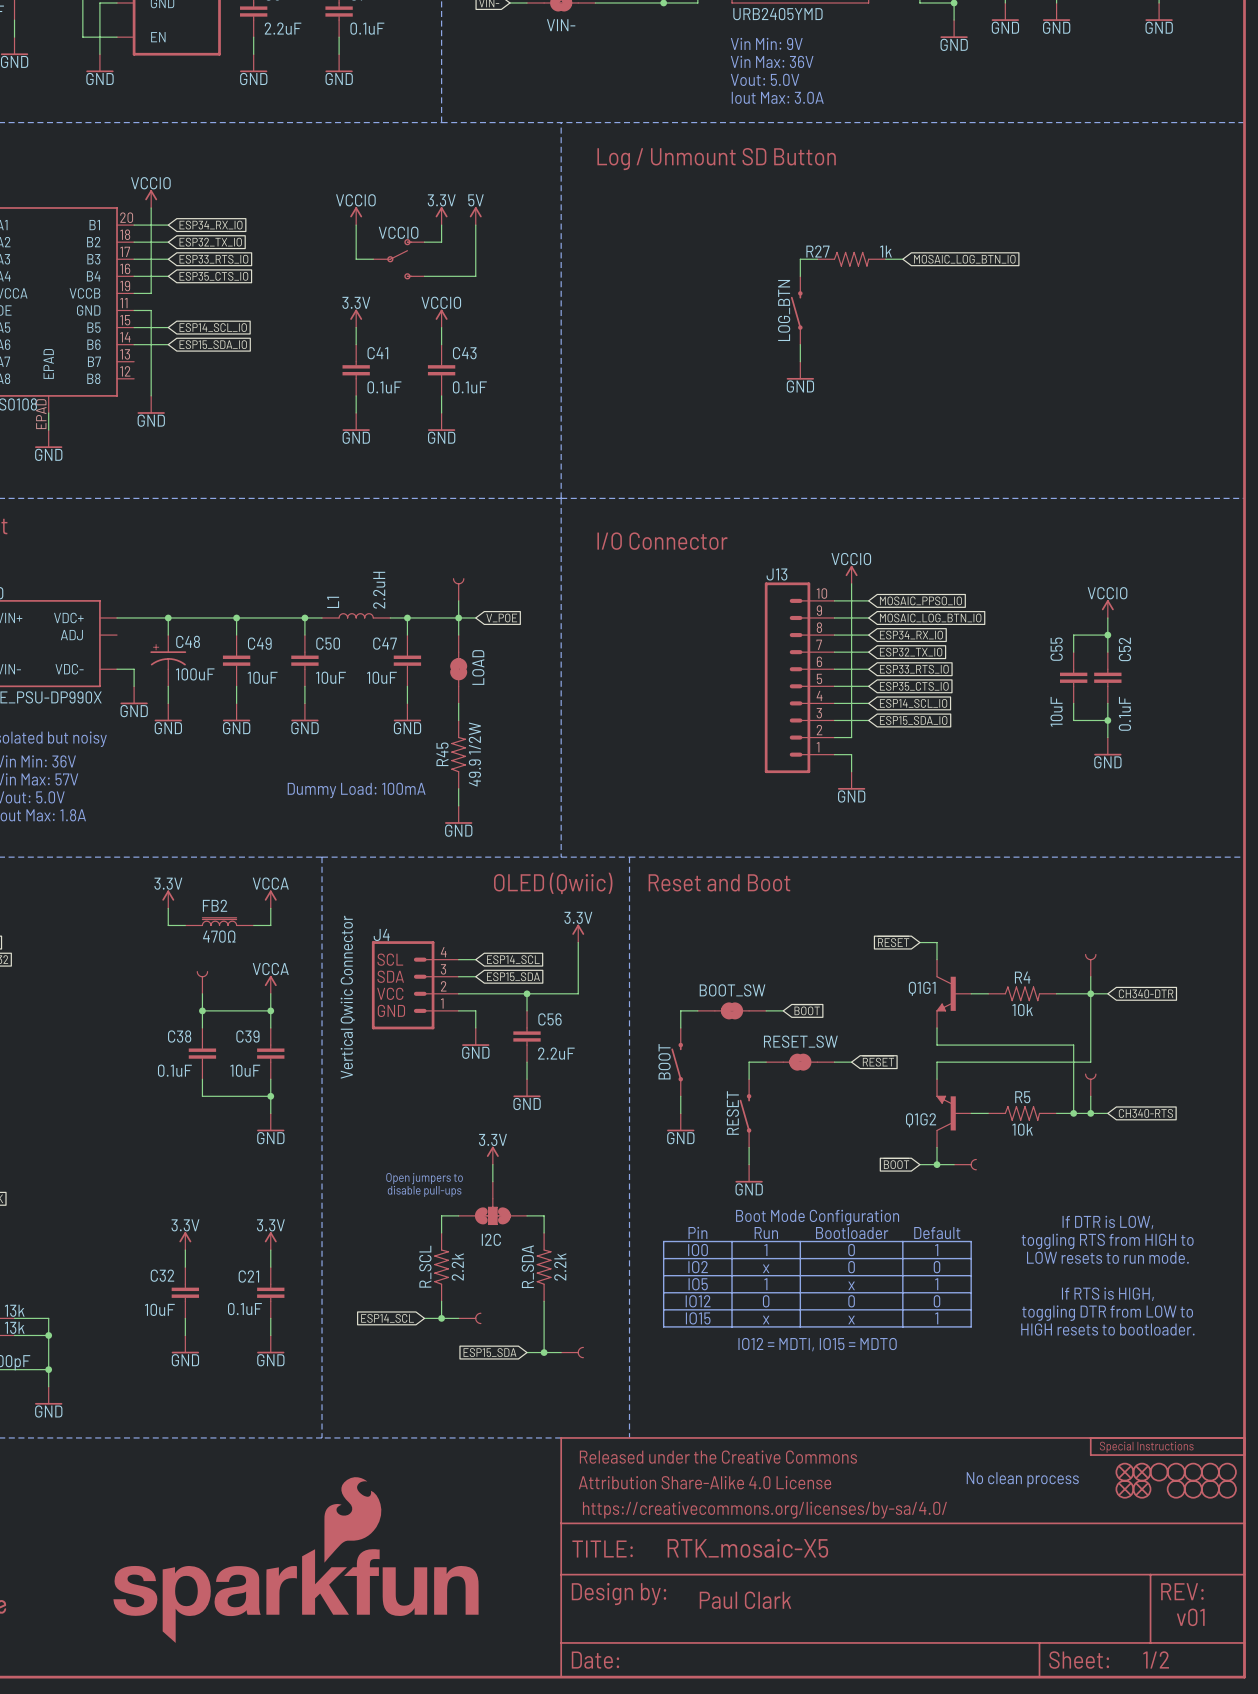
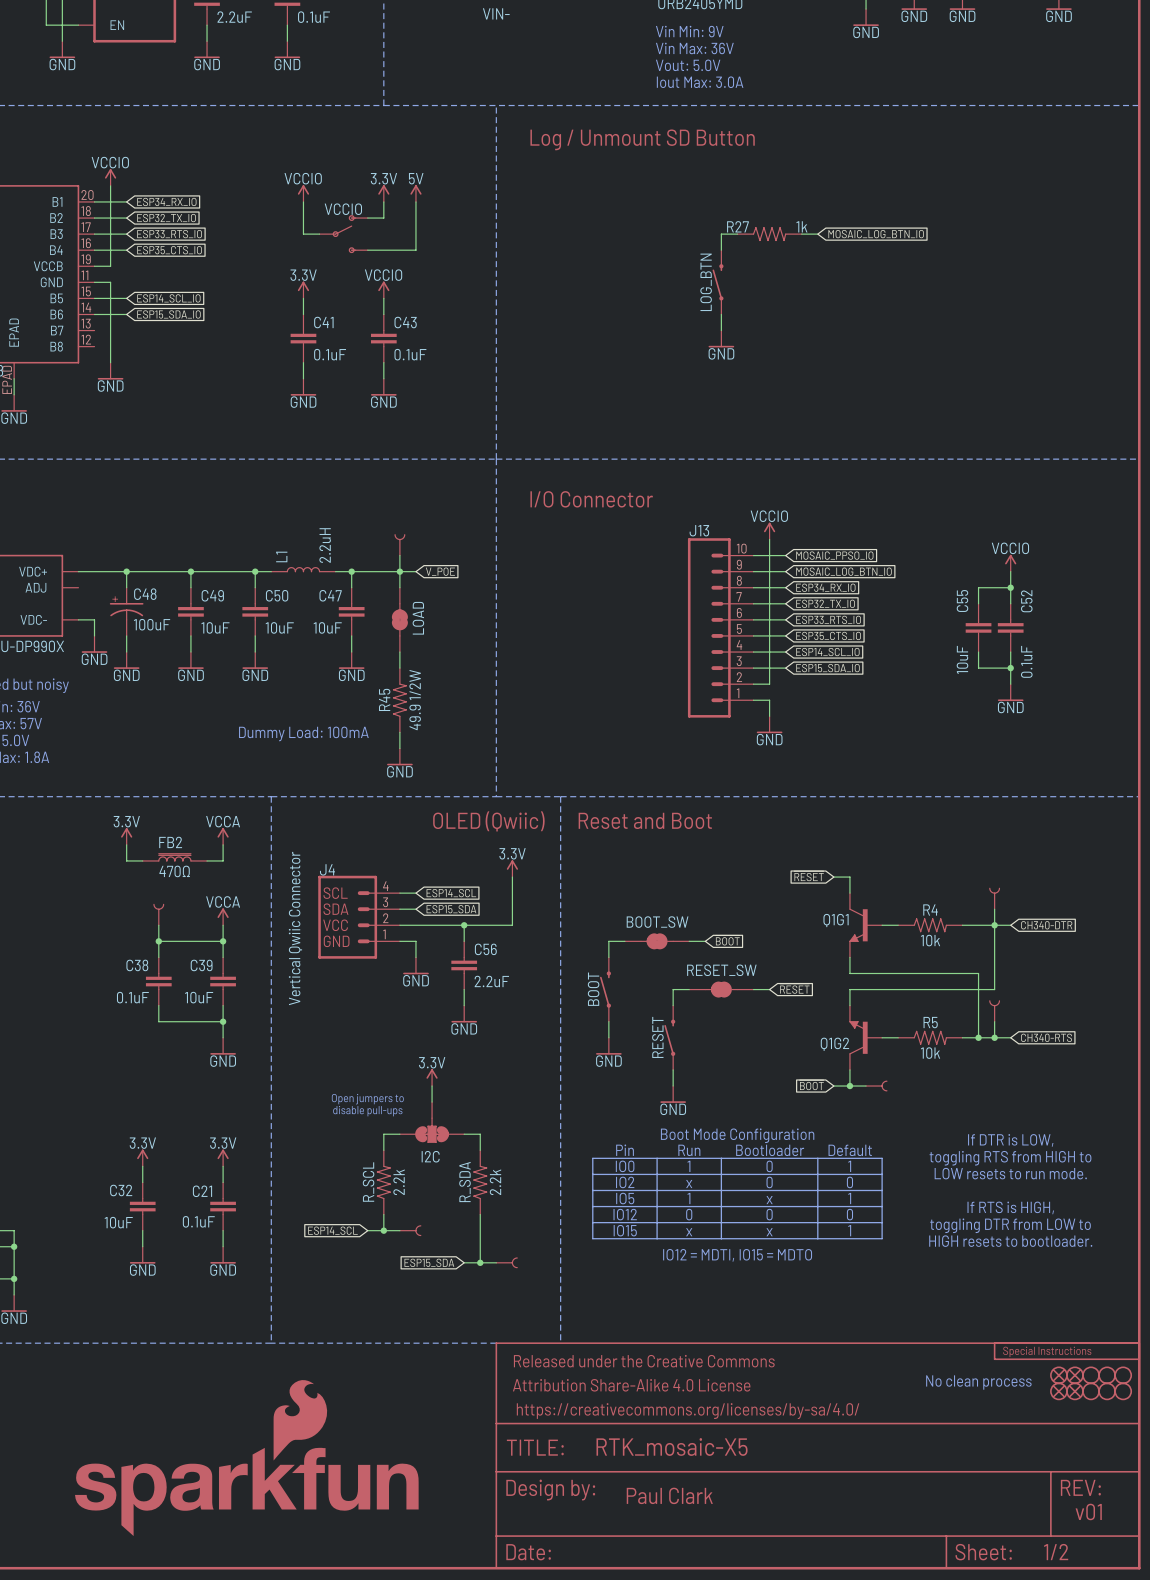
part symbol: [1149, 1462, 1169, 1482] -> [1050, 1366, 1068, 1385]
part symbol: [1166, 1462, 1186, 1482] -> [1066, 1366, 1084, 1385]
part: (1124, 1472) -> none
part: (1142, 1472) -> none
text position: No clean process (1022, 1479) -> No clean process (978, 1382)
part symbol: [1166, 1479, 1186, 1499] -> [1066, 1382, 1084, 1401]
part: (1124, 1489) -> none
part: (1142, 1489) -> none
part: none -> (1058, 1391)

